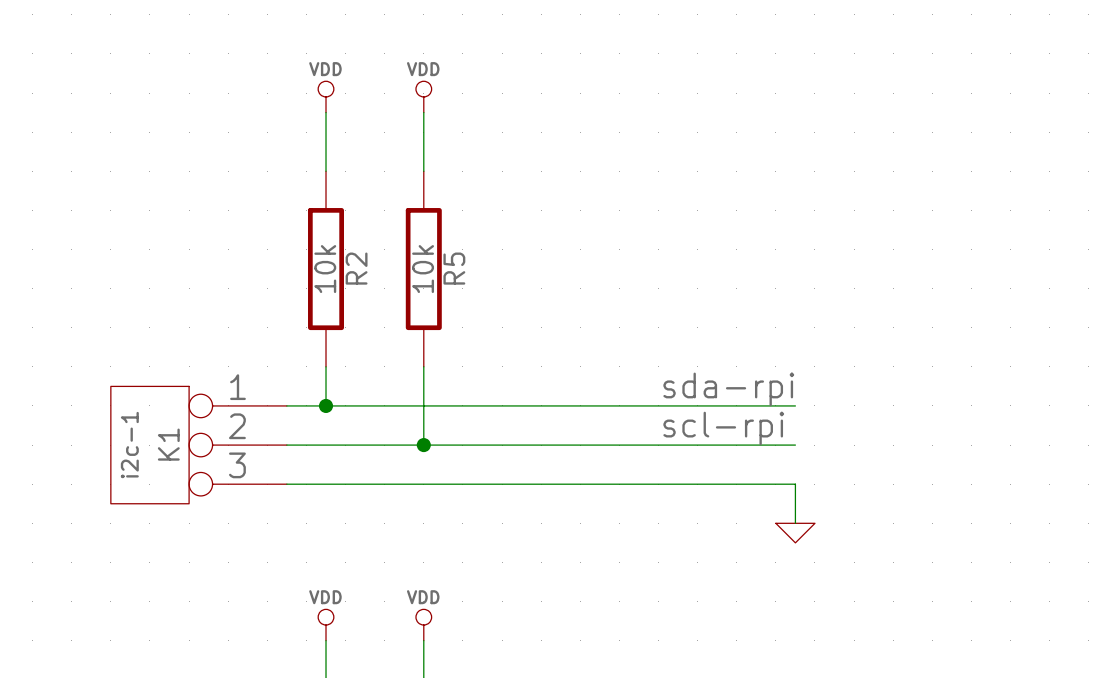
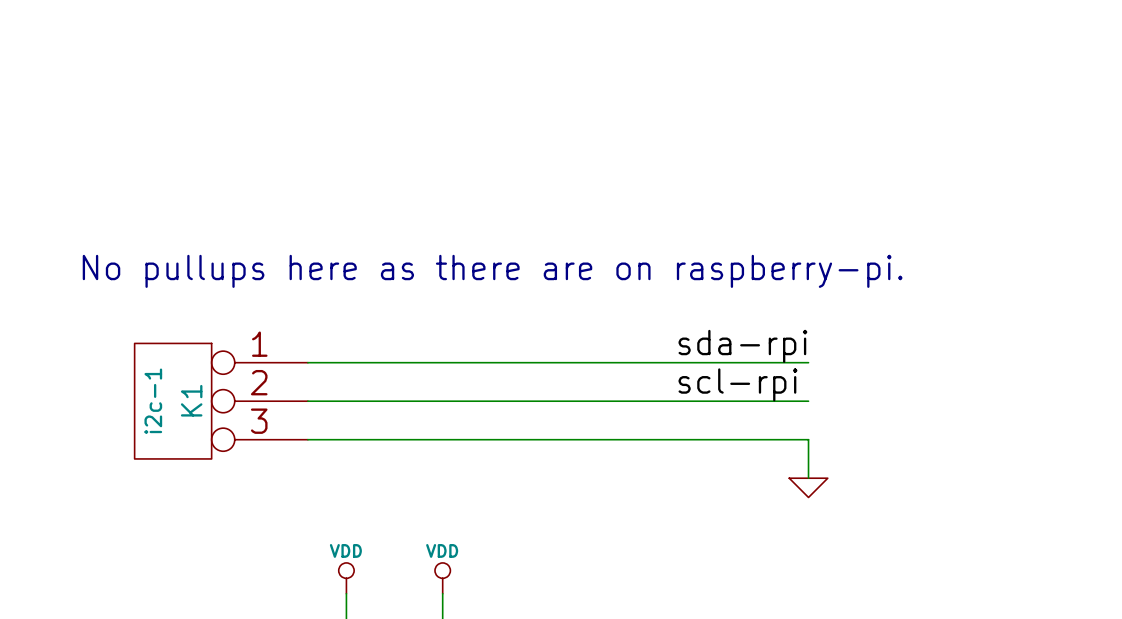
power symbol: VDD (326, 96) -> none
power symbol: VDD (423, 96) -> none
wire: (326, 112) (326, 171) -> none
wire: (423, 112) (423, 171) -> none
R2: 10k (326, 269) -> none
R5: 10k (423, 269) -> none
text: none -> No pullups here as there are on raspberry-pi. (492, 271)
wire: (326, 366) (326, 405) -> none
wire: (423, 366) (423, 445) -> none
junction: (326, 405) -> none
junction: (423, 445) -> none

